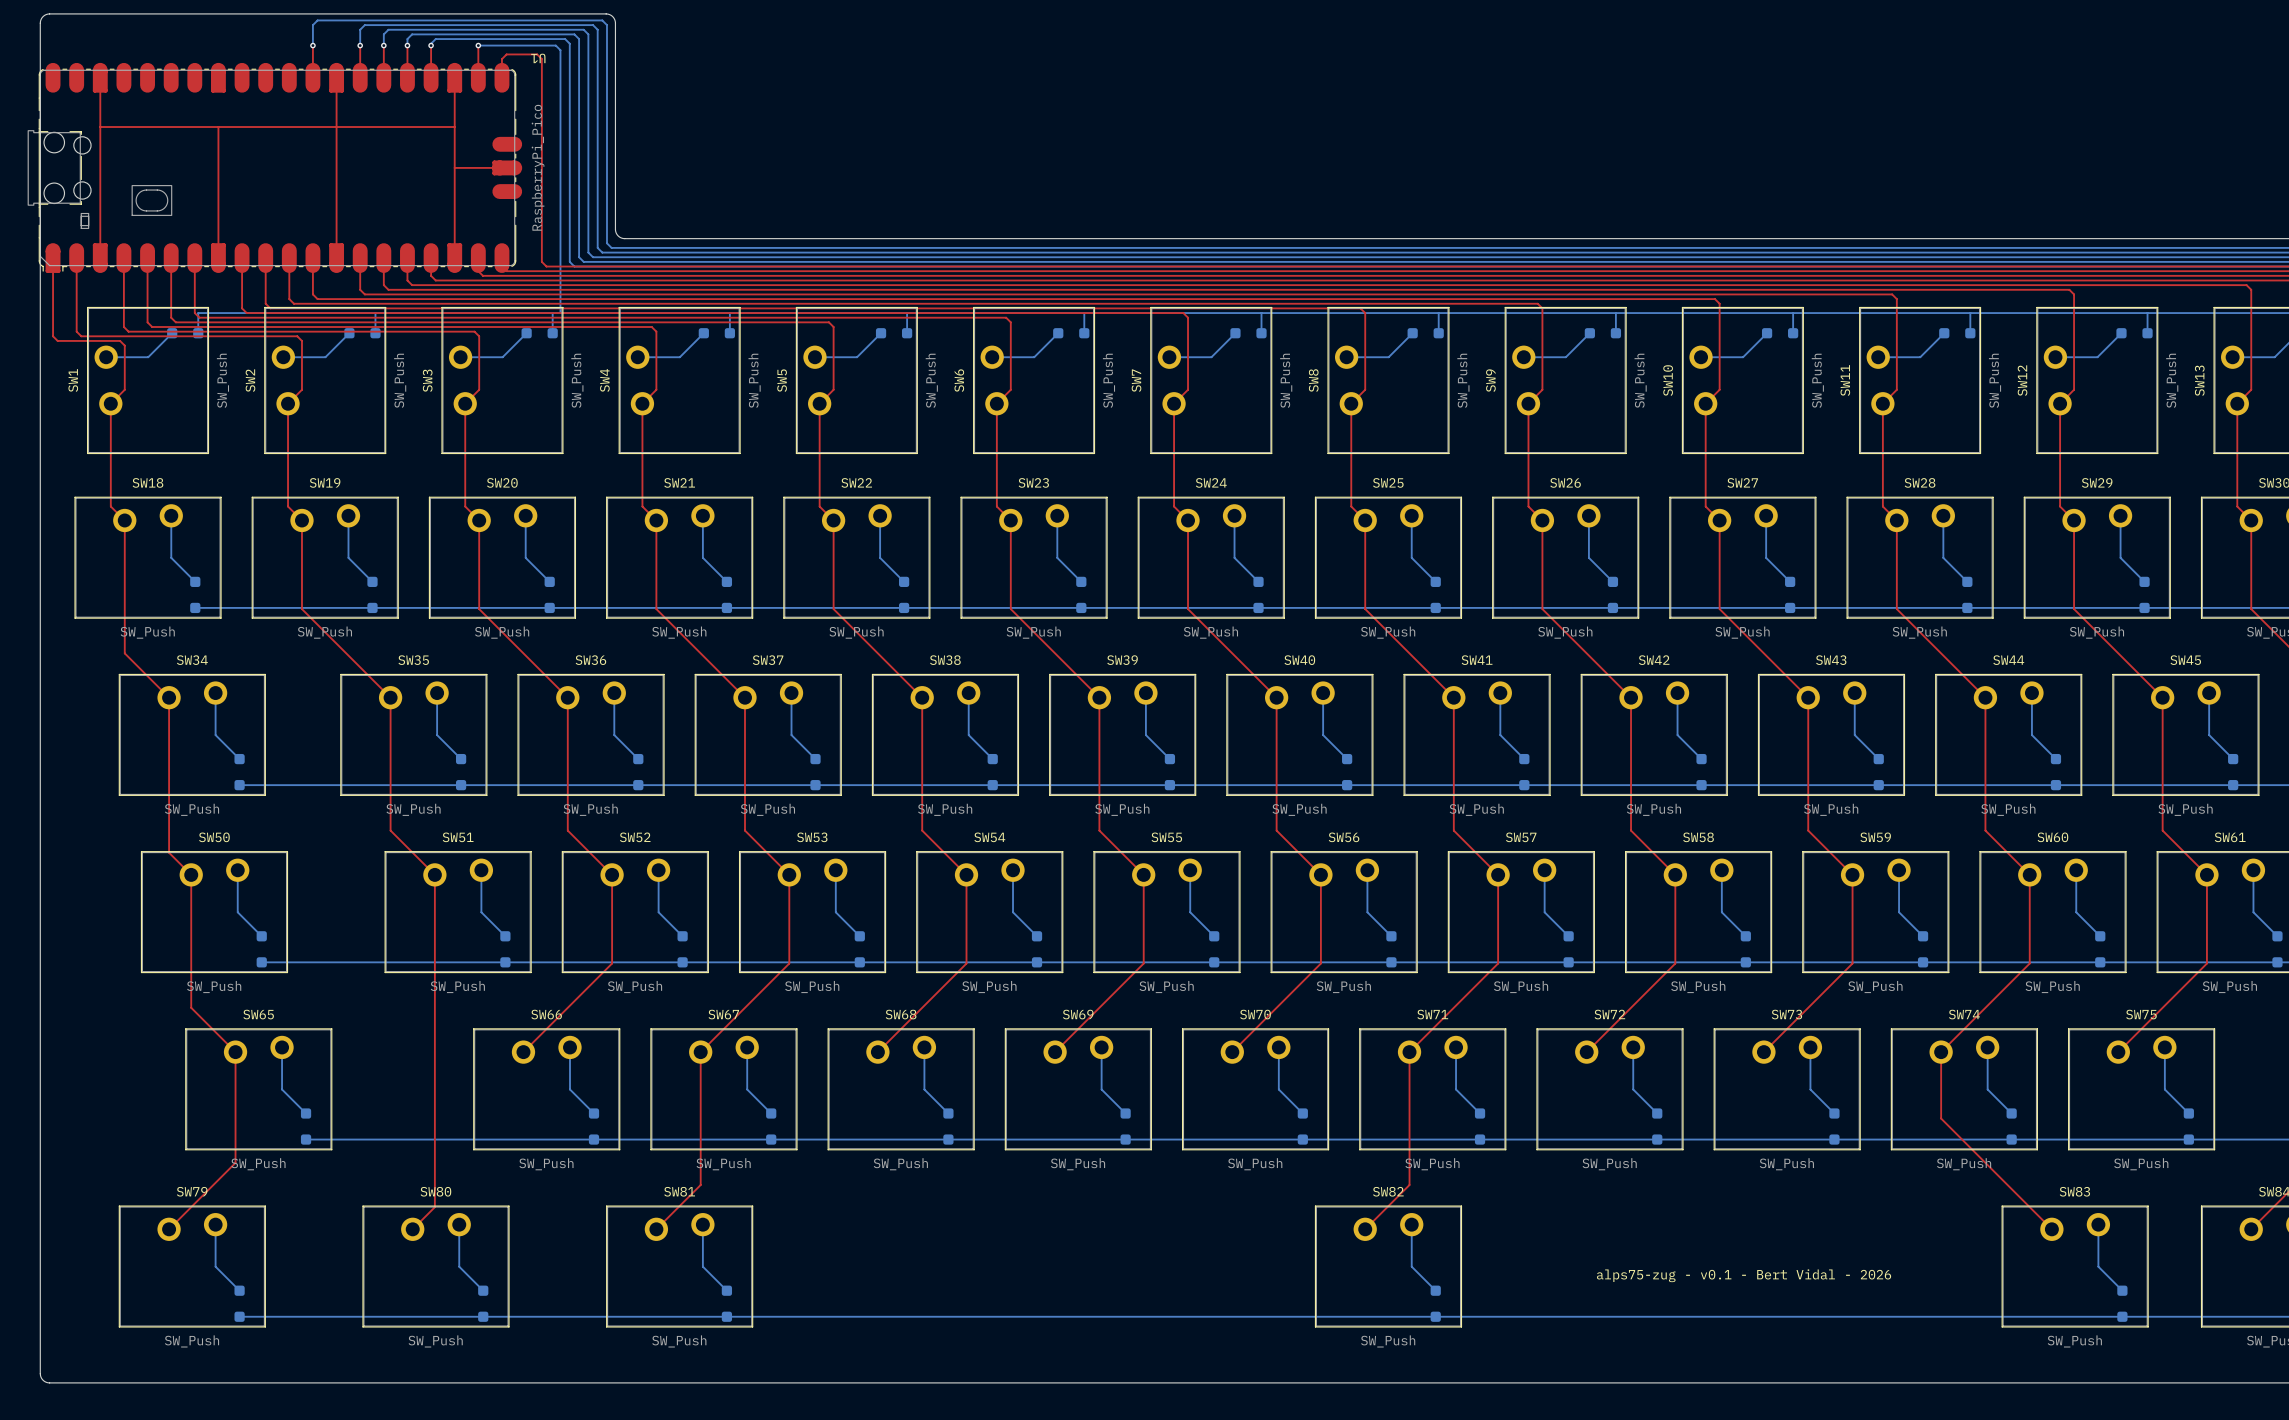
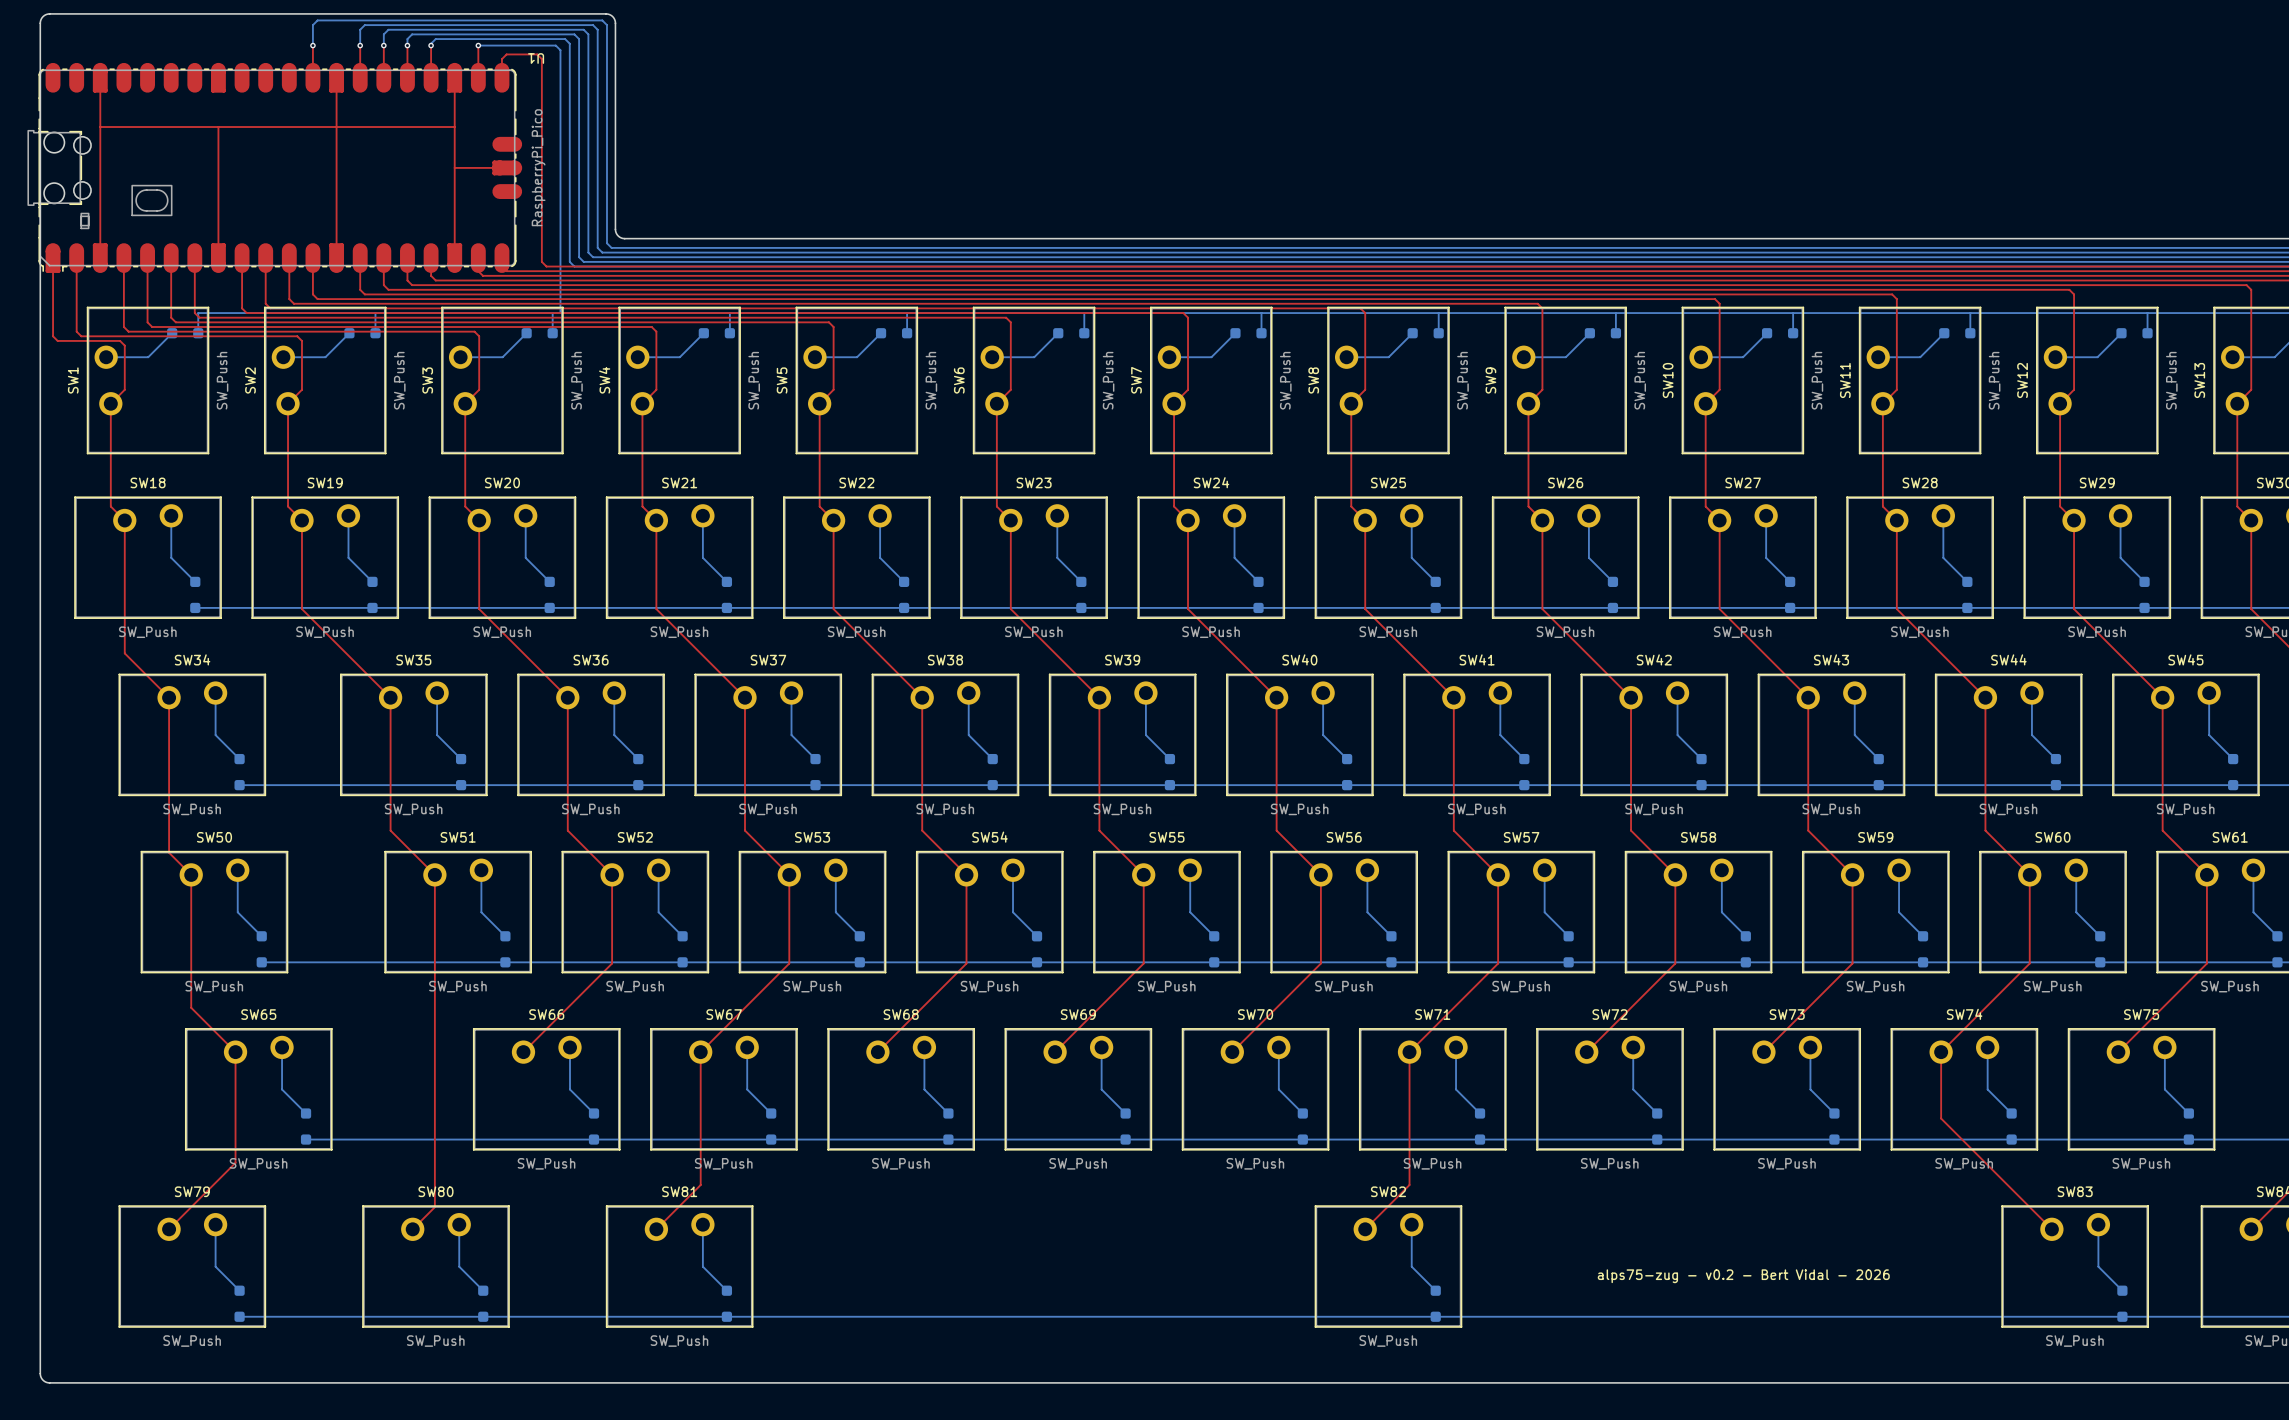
text: alps75-zug - v0.1 - Bert Vidal - 2026 (1744, 1275) -> alps75-zug - v0.2 - Bert Vidal - 2026 (1743, 1276)

